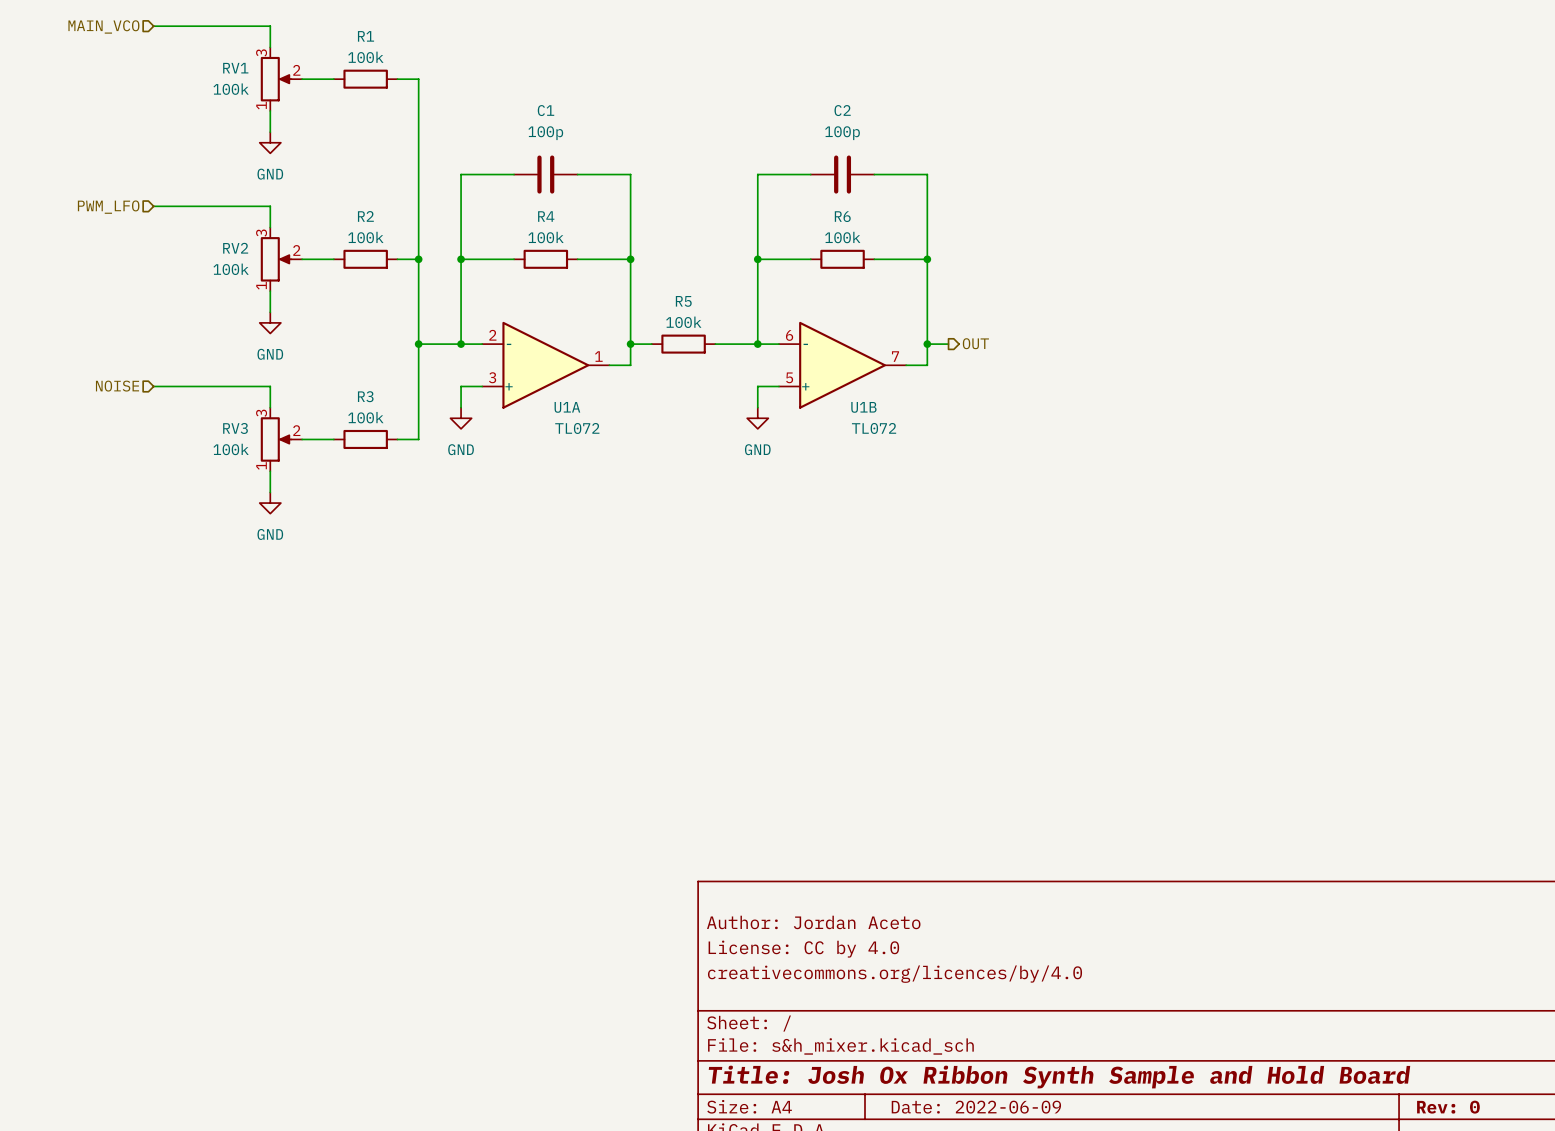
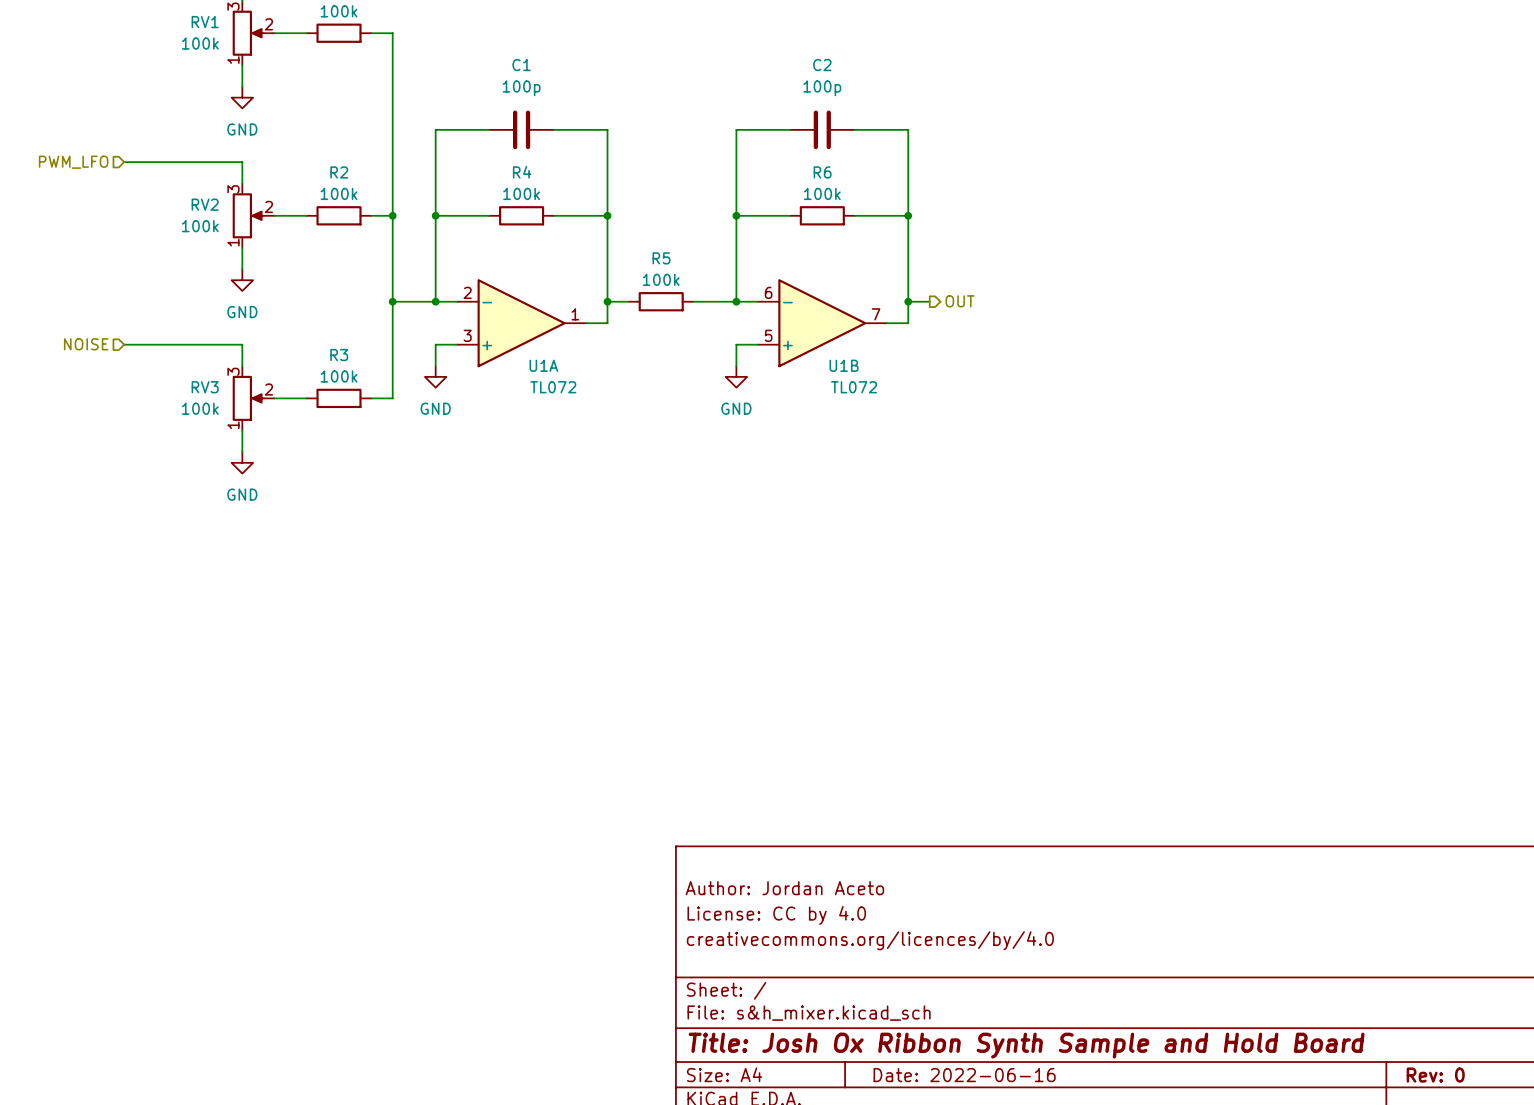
title block: Date: 2022-06-09 (976, 1107) -> Date: 2022-06-16 (964, 1075)

